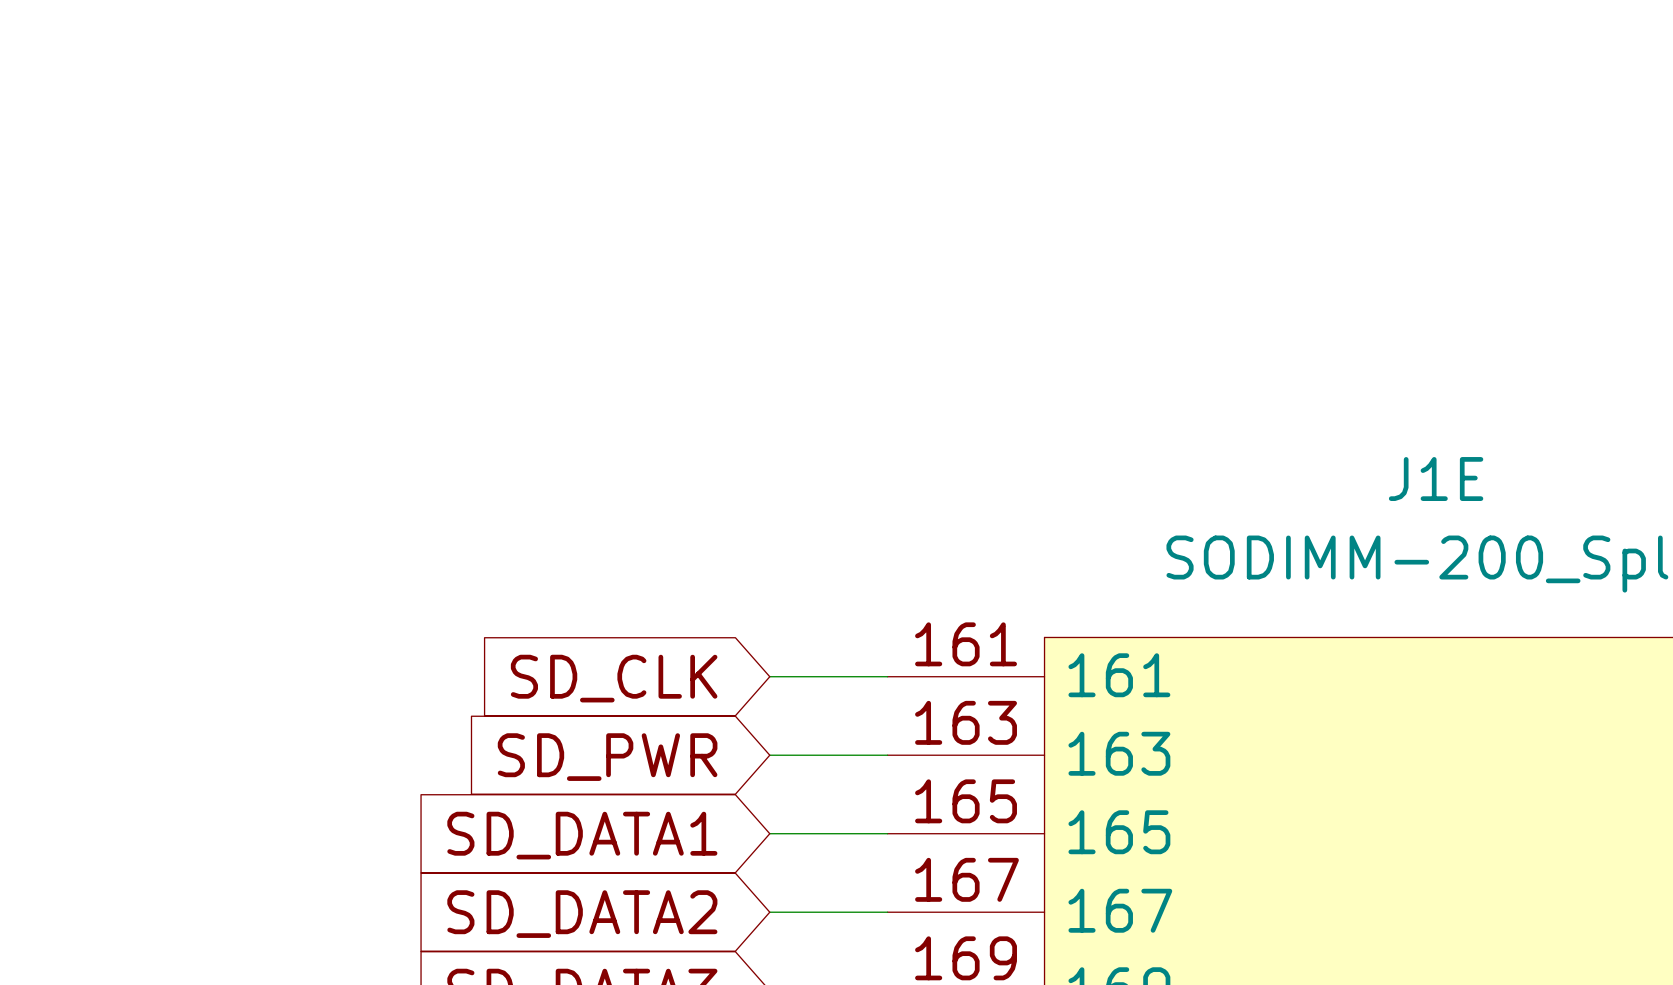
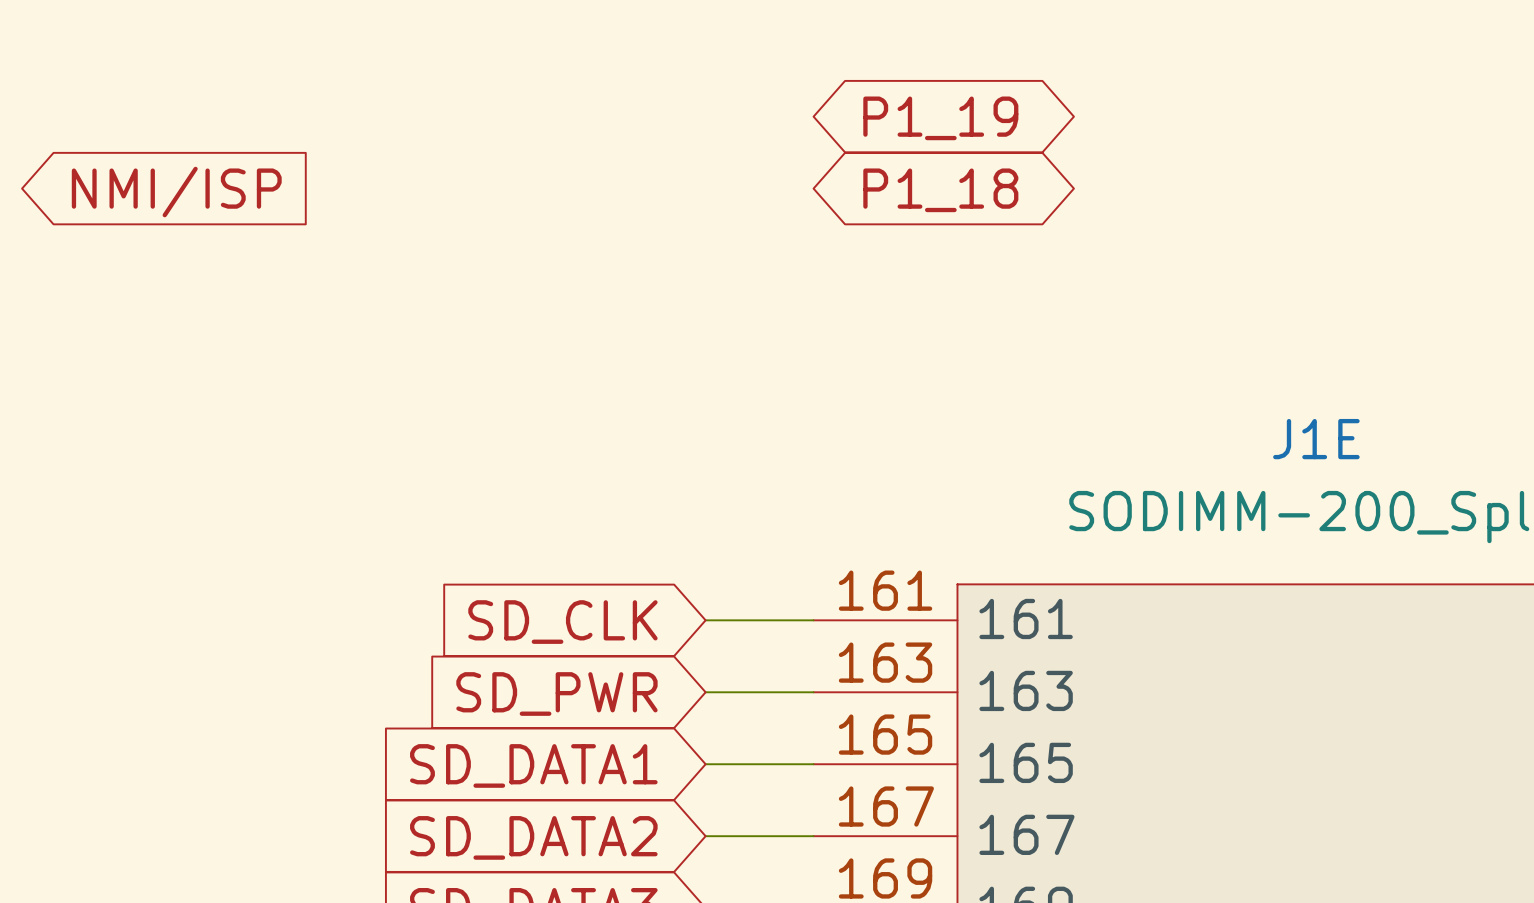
global label: none -> P1_19 (940, 118)
global label: none -> P1_18 (940, 190)
global label: none -> NMI/ISP (176, 192)

